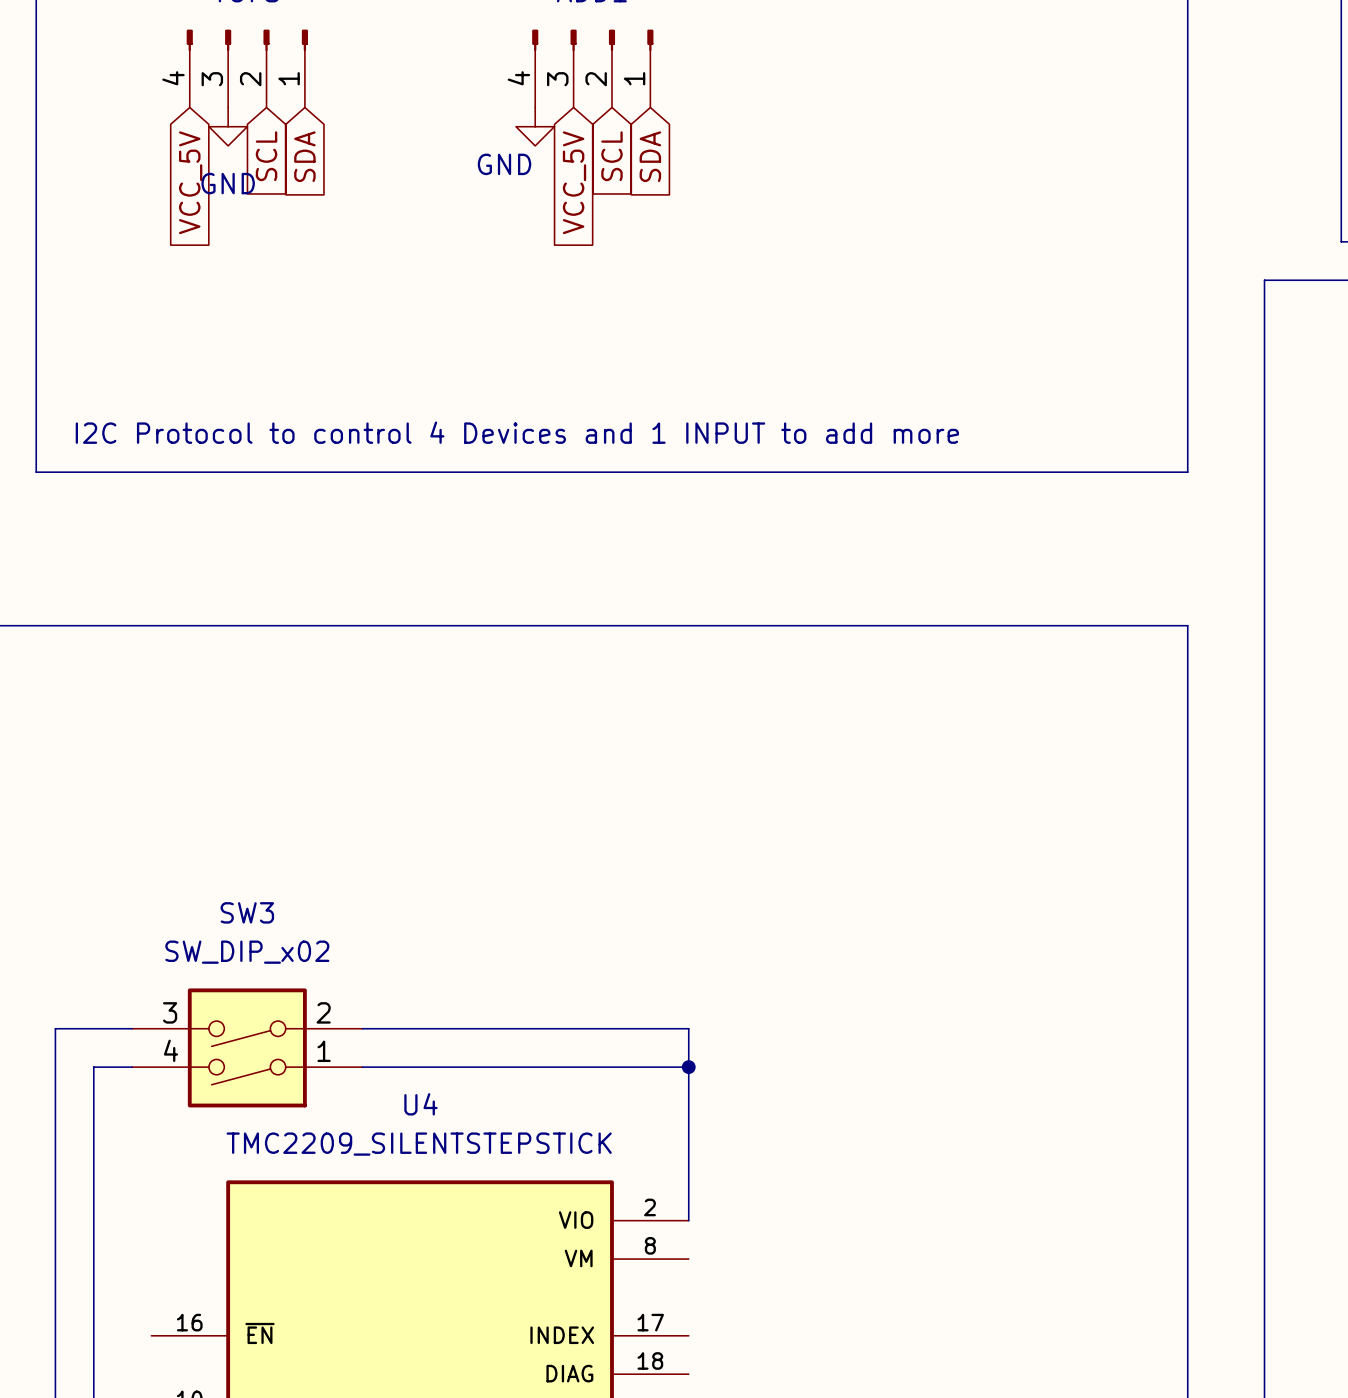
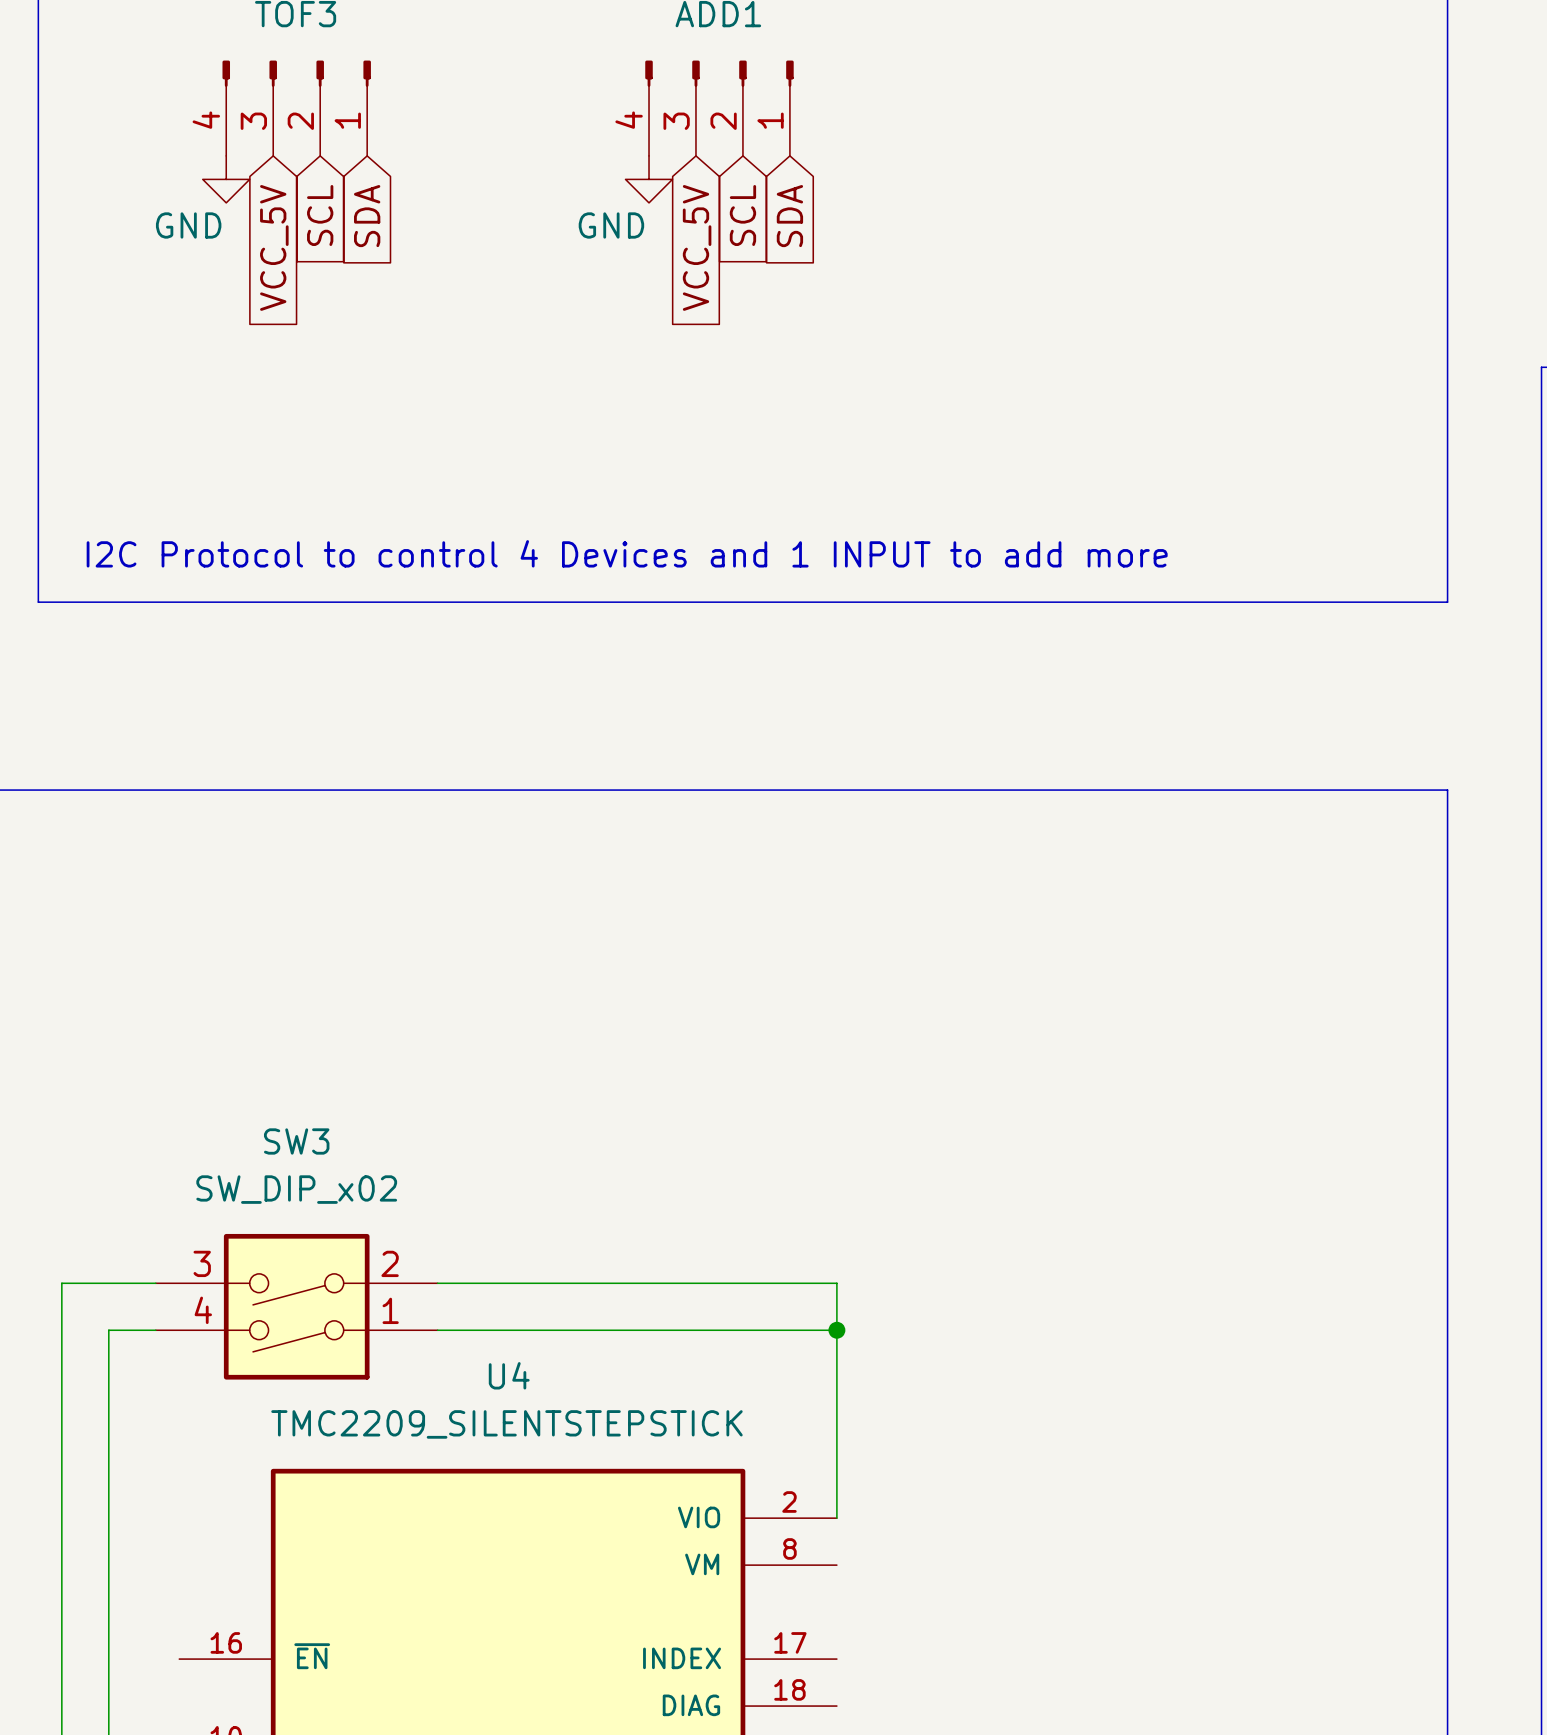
power symbol position: GND (228, 126) -> GND (226, 179)
global label position: VCC_5V (190, 182) -> VCC_5V (274, 247)
power symbol text position: GND (228, 183) -> GND (188, 225)

